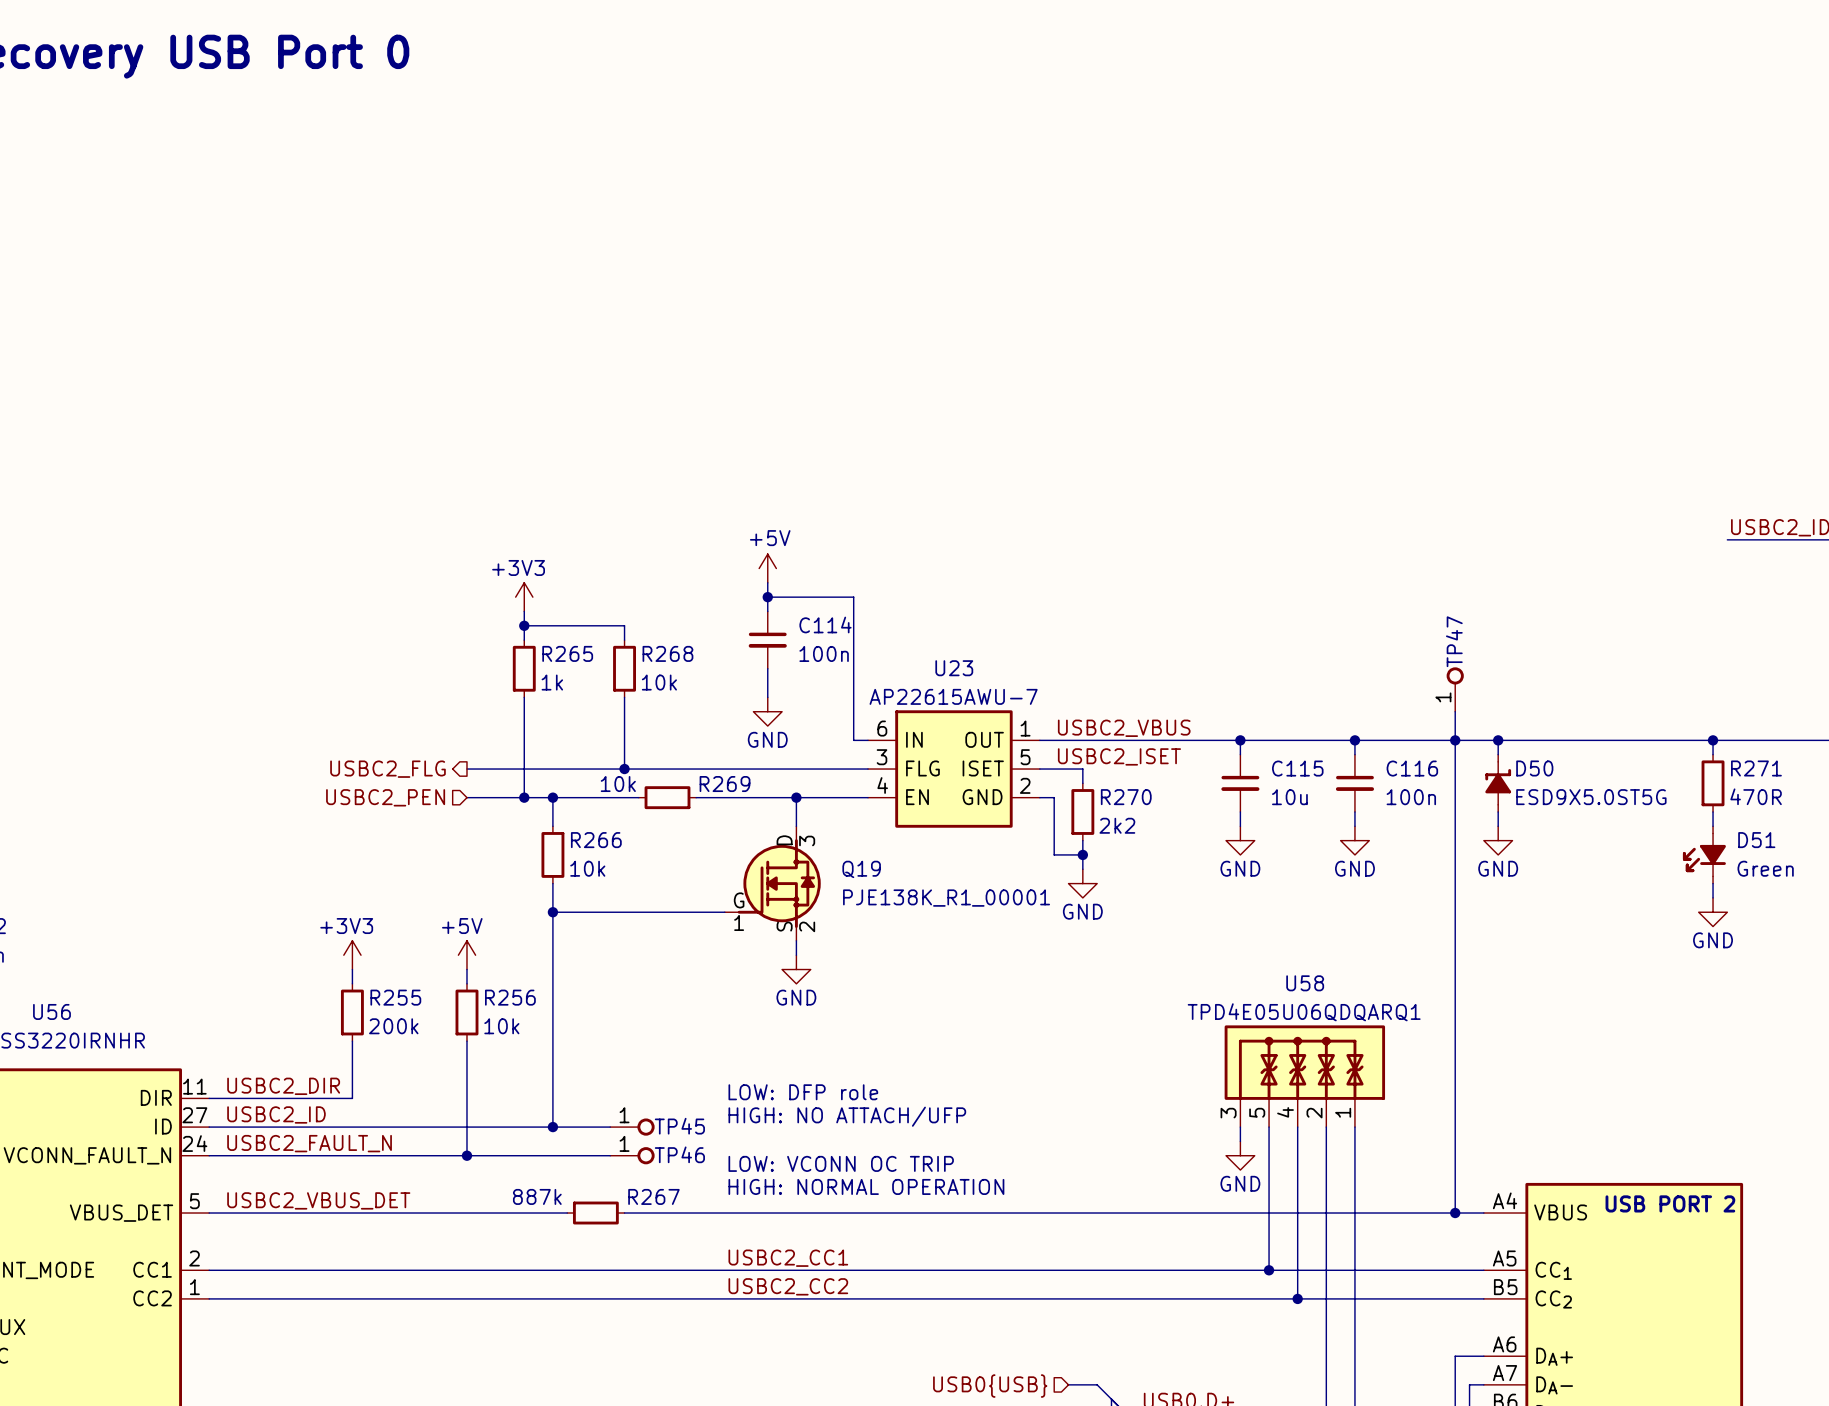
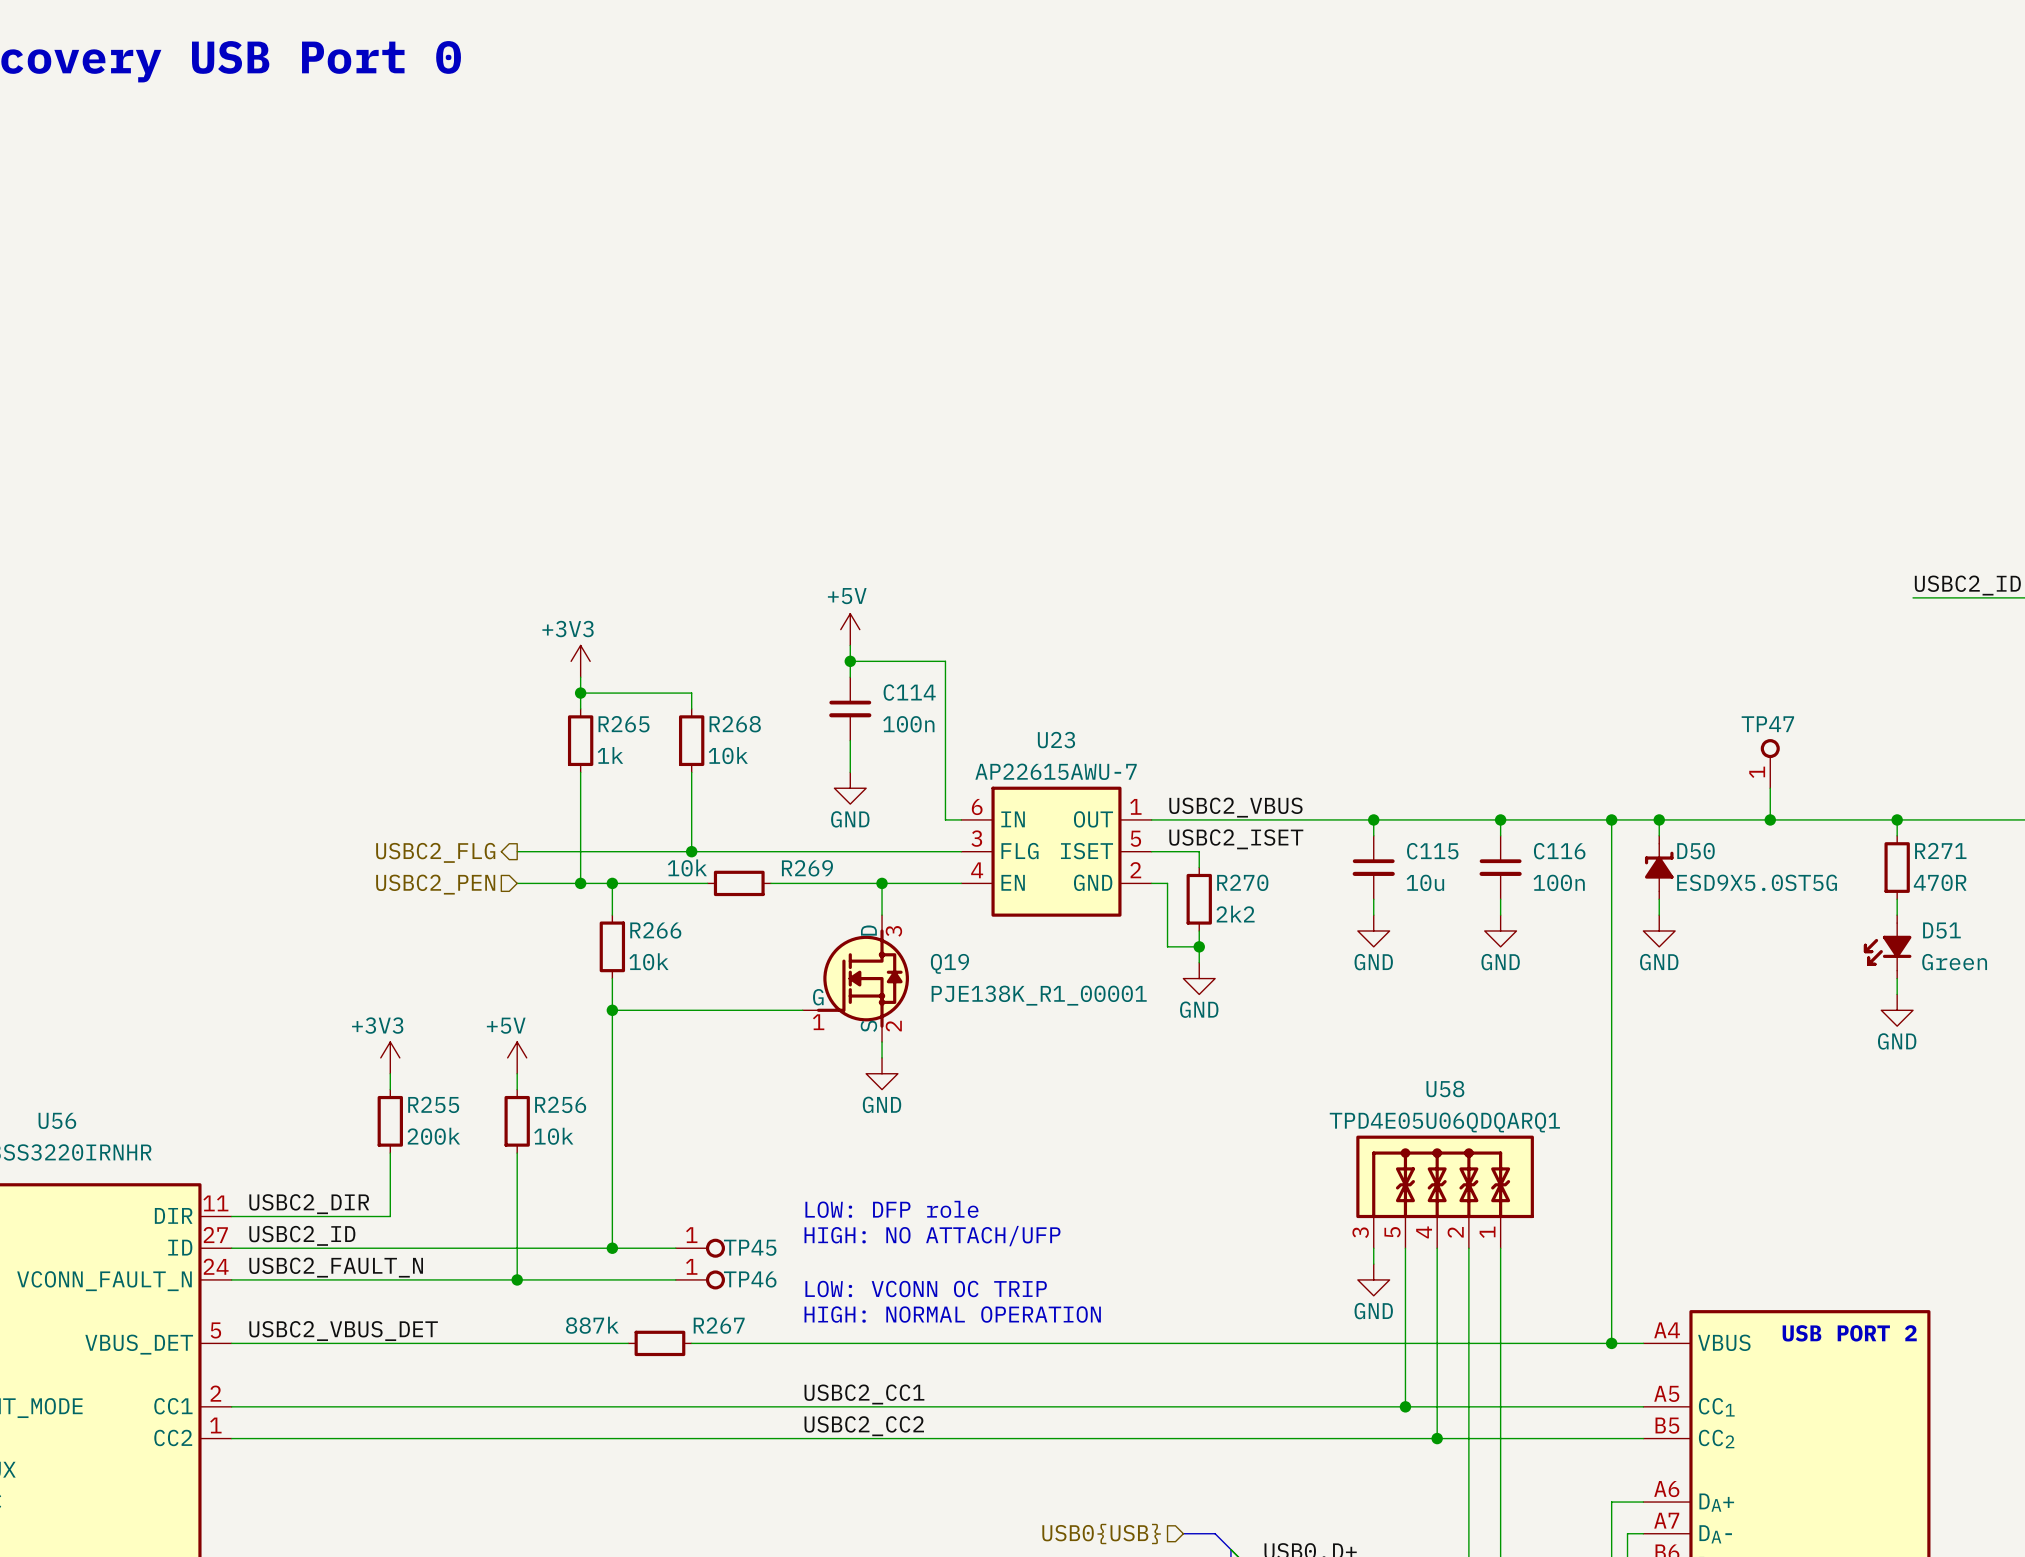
TP47 name rotation: 0° (1454, 641) -> 90° clockwise (1767, 724)
TP47 position: (1455, 689) -> (1770, 763)
wire: (1455, 711) (1455, 740) -> (1770, 788) (1770, 819)
junction: none -> (1770, 819)

